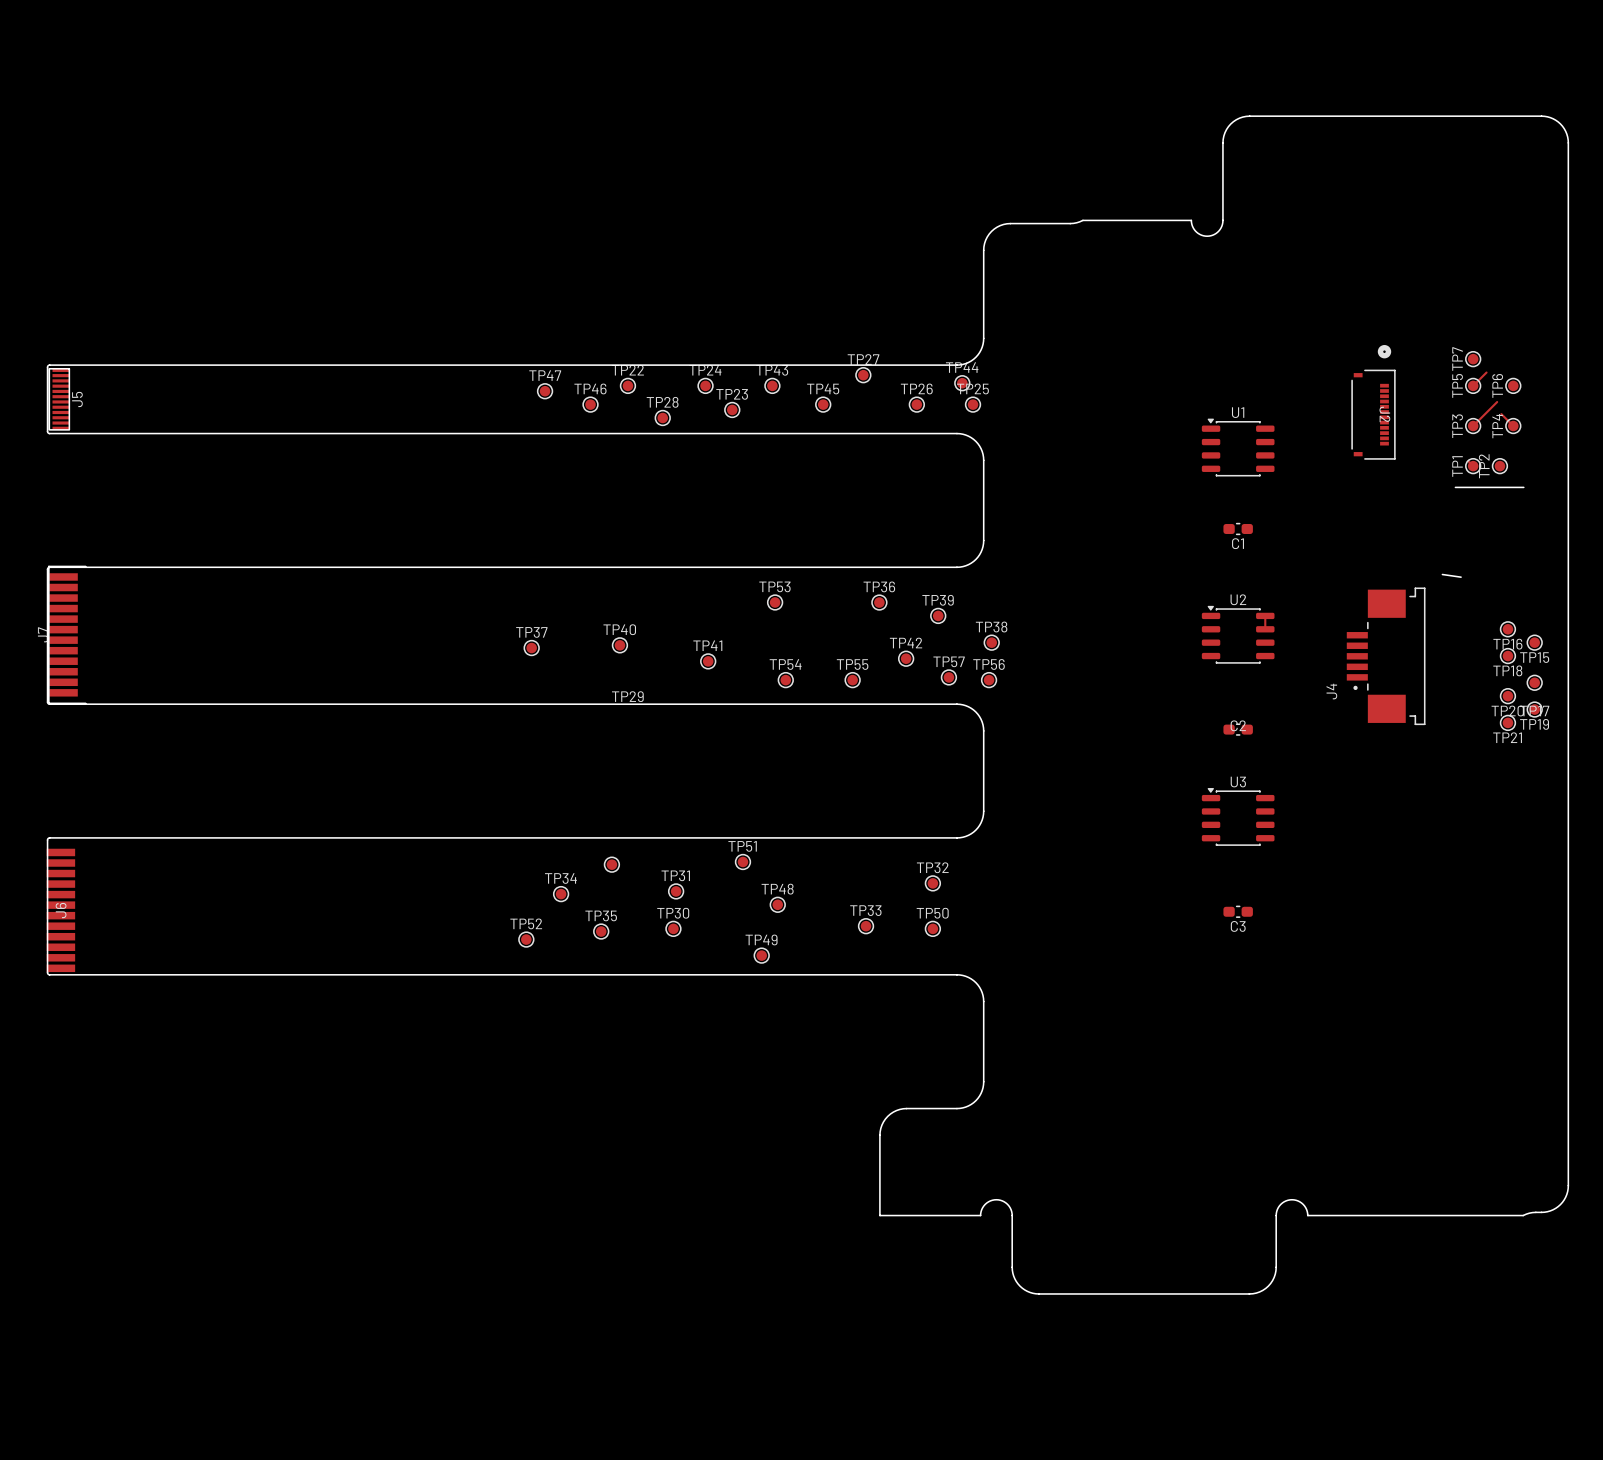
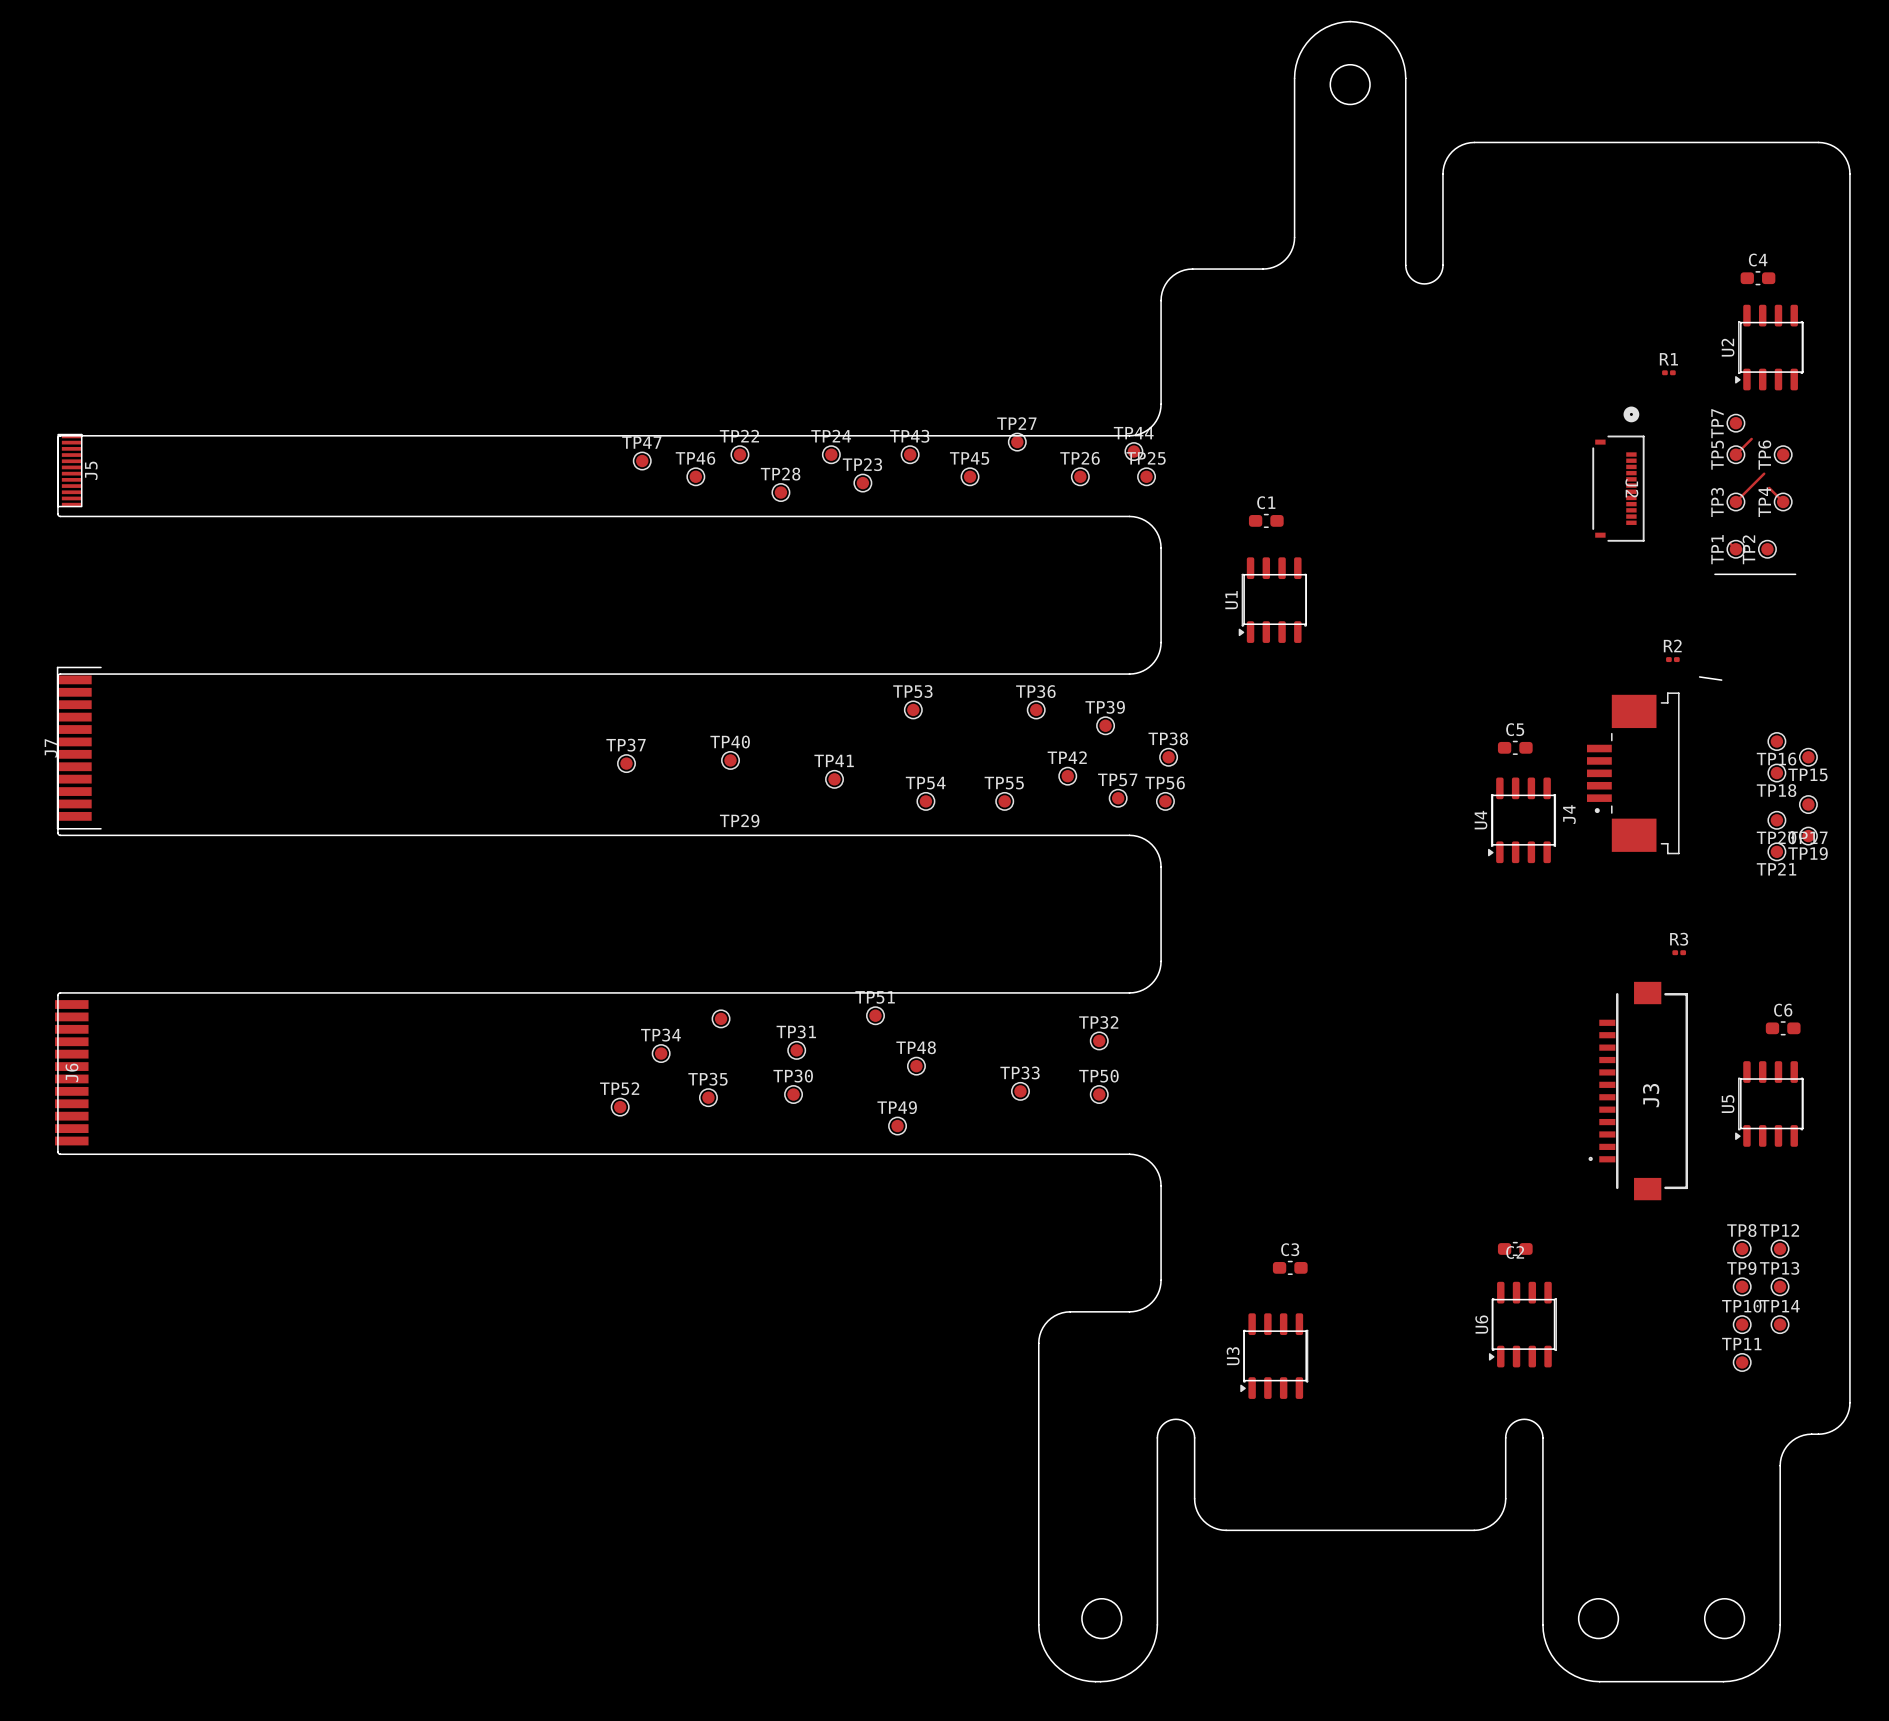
round board edge: none -> [1329, 64, 1371, 106]
board edge: (1249, 116) (1544, 116) (1558, 122) (1564, 128) (1567, 136) (1568, 1185) (1565, 1197) (1558, 1206) (1547, 1211) (1523, 1215) (1307, 1215) (1303, 1204) (1298, 1200) (1289, 1199) (1280, 1204) (1276, 1213) (1275, 1274) (1270, 1283) (1259, 1291) (1249, 1293) (1035, 1293) (1022, 1288) (1013, 1276) (1012, 1213) (1008, 1205) (1004, 1201) (996, 1199) (988, 1201) (982, 1207) (980, 1215) (879, 1215) (879, 1135) (885, 1119) (893, 1112) (903, 1108) (965, 1107) (975, 1100) (982, 1090) (983, 998) (977, 984) (965, 976) (47, 973) (47, 840) (49, 837) (956, 837) (965, 836) (975, 830) (982, 820) (983, 811) (983, 724) (975, 712) (968, 706) (959, 704) (49, 704) (47, 702) (47, 569) (49, 567) (959, 567) (968, 564) (975, 559) (981, 552) (983, 543) (983, 457) (979, 446) (968, 436) (956, 433) (49, 433) (47, 431) (48, 365) (962, 364) (975, 357) (983, 344) (983, 246) (987, 236) (994, 229) (1010, 223) (1070, 223) (1082, 220) (1191, 220) (1193, 227) (1198, 233) (1205, 236) (1212, 235) (1218, 230) (1222, 222) (1223, 135) (1233, 121) (1249, 116) -> (1350, 21) (1331, 25) (1315, 34) (1303, 48) (1295, 65) (1294, 237) (1291, 251) (1282, 262) (1270, 268) (1188, 269) (1176, 273) (1167, 281) (1162, 292) (1161, 300) (1160, 411) (1151, 426) (1139, 434) (1129, 435) (60, 435) (58, 437) (57, 513) (60, 516) (1129, 516) (1145, 520) (1156, 532) (1160, 543) (1160, 646) (1157, 656) (1151, 664) (1143, 670) (1133, 673) (59, 674) (57, 676) (57, 832) (60, 835) (1133, 835) (1145, 839) (1151, 844) (1156, 851) (1160, 862) (1160, 964) (1157, 975) (1149, 986) (1139, 991) (1129, 992) (60, 992) (57, 995) (58, 1153) (1137, 1155) (1151, 1163) (1156, 1170) (1160, 1181) (1161, 1280) (1157, 1294) (1149, 1304) (1136, 1311) (1070, 1311) (1058, 1314) (1045, 1324) (1039, 1339) (1039, 1631) (1047, 1655) (1060, 1669) (1082, 1680) (1113, 1680) (1136, 1669) (1151, 1649) (1157, 1624) (1157, 1435) (1164, 1423) (1176, 1419) (1187, 1423) (1193, 1433) (1194, 1498) (1197, 1510) (1206, 1523) (1217, 1529) (1226, 1530) (1474, 1530) (1486, 1527) (1496, 1521) (1504, 1506) (1507, 1430) (1517, 1420) (1531, 1420) (1539, 1426) (1542, 1437) (1543, 1631) (1548, 1649) (1559, 1665) (1580, 1678) (1599, 1681) (1729, 1681) (1742, 1678) (1758, 1669) (1771, 1655) (1779, 1631) (1780, 1465) (1782, 1453) (1789, 1443) (1799, 1436) (1825, 1433) (1835, 1429) (1845, 1419) (1849, 1406) (1848, 165) (1843, 154) (1837, 148) (1826, 143) (1818, 142) (1466, 143) (1452, 151) (1447, 158) (1443, 169) (1441, 271) (1433, 281) (1419, 283) (1410, 277) (1405, 267) (1404, 65) (1397, 48) (1384, 34) (1368, 25) (1350, 21)
C4: none -> (1757, 278)
board edge: none -> (1740, 322) (1740, 372) (1802, 372) (1802, 322) (1740, 322)
R1: none -> (1668, 372)
U1 rotation: 0° (1238, 447) -> 90° counterclockwise (1272, 600)
U1 position: (1238, 447) -> (1272, 600)
board edge: none -> (1244, 574) (1244, 624) (1306, 624) (1306, 574) (1244, 574)
C1 position: (1238, 528) -> (1266, 520)
C1 name position: C1 (1238, 543) -> C1 (1266, 502)
R2: none -> (1672, 659)
track: (1265, 615) (1265, 629) -> none
U2 rotation: 0° (1238, 634) -> 90° counterclockwise (1769, 347)
U2 position: (1238, 634) -> (1769, 347)
C5: none -> (1515, 747)
board edge: none -> (1492, 795) (1492, 844) (1554, 844) (1554, 795) (1492, 795)
U4: none -> (1522, 820)
C2 name position: C2 (1238, 725) -> C2 (1515, 1252)
C2 position: (1238, 729) -> (1515, 1248)
R3: none -> (1679, 952)
U3 rotation: 0° (1238, 816) -> 90° counterclockwise (1274, 1356)
U3 position: (1238, 816) -> (1274, 1356)
C6: none -> (1783, 1028)
C3 position: (1238, 911) -> (1290, 1267)
board edge: none -> (1740, 1079) (1740, 1128) (1802, 1128) (1802, 1079) (1740, 1079)
J3: none -> (1638, 1091)
C3 name position: C3 (1238, 926) -> C3 (1290, 1249)
U5: none -> (1769, 1103)
TP8: none -> (1742, 1248)
TP12: none -> (1780, 1248)
TP9: none -> (1742, 1286)
TP13: none -> (1780, 1286)
board edge: none -> (1492, 1299) (1492, 1349) (1554, 1349) (1554, 1299) (1492, 1299)
U6: none -> (1522, 1324)
TP10: none -> (1742, 1324)
TP14: none -> (1780, 1324)
board edge: none -> (1244, 1331) (1244, 1380) (1306, 1380) (1306, 1331) (1244, 1331)
TP11: none -> (1742, 1362)
round board edge: none -> [1081, 1598, 1123, 1640]
round board edge: none -> [1578, 1598, 1619, 1640]
round board edge: none -> [1704, 1598, 1746, 1640]

